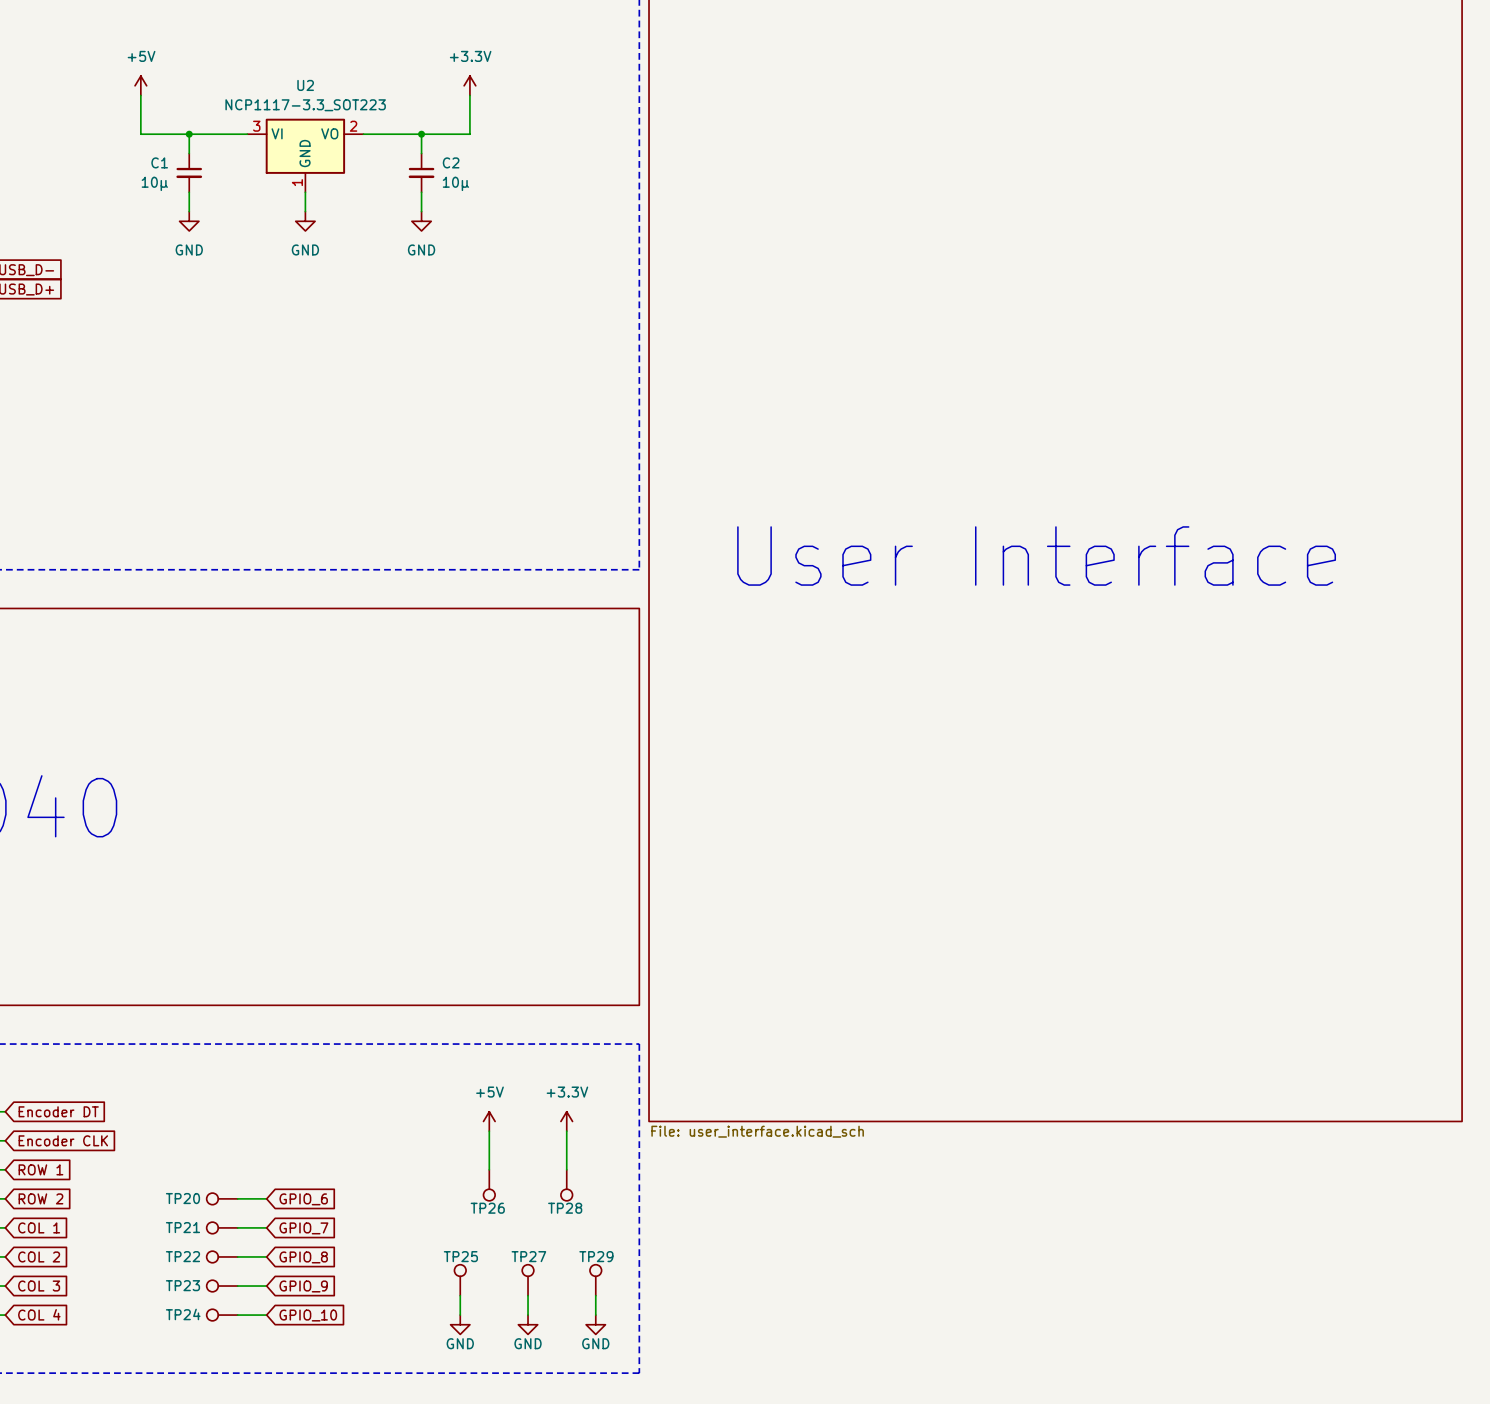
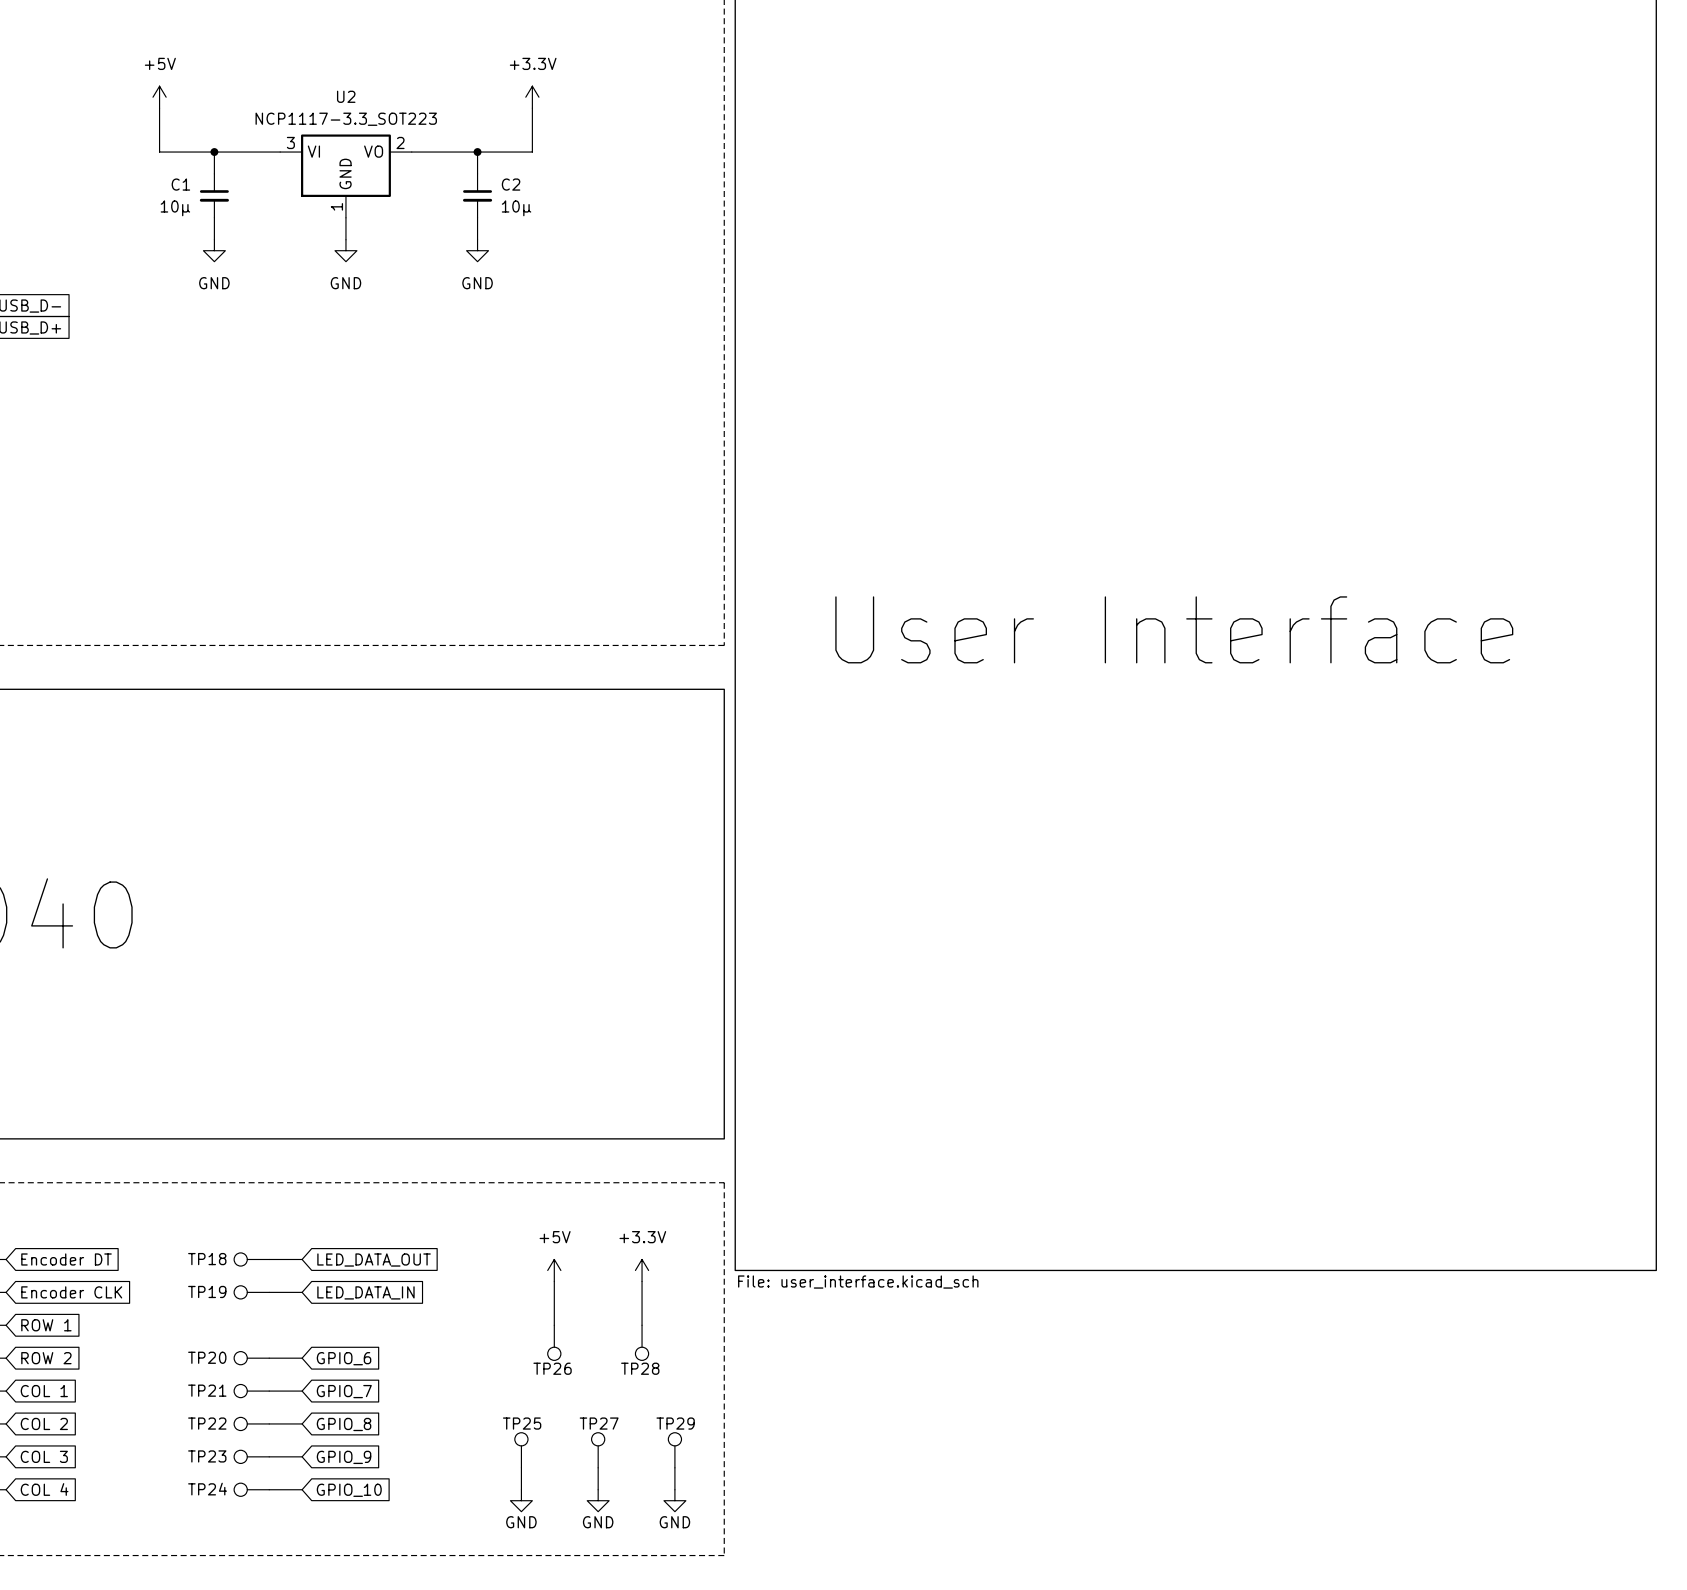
TP18: none -> (251, 1259)
wire: none -> (269, 1259) (302, 1259)
global label: none -> LED_DATA_OUT (374, 1260)
TP19: none -> (251, 1292)
wire: none -> (269, 1292) (302, 1292)
global label: none -> LED_DATA_IN (365, 1292)

